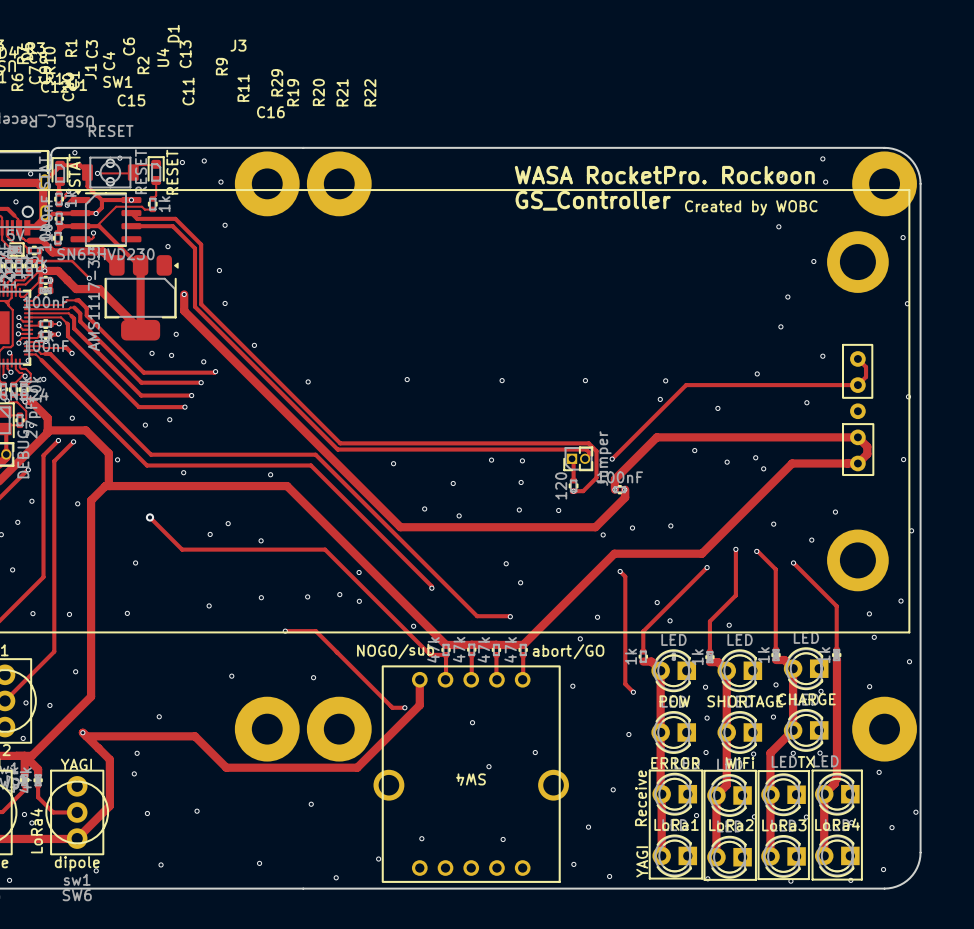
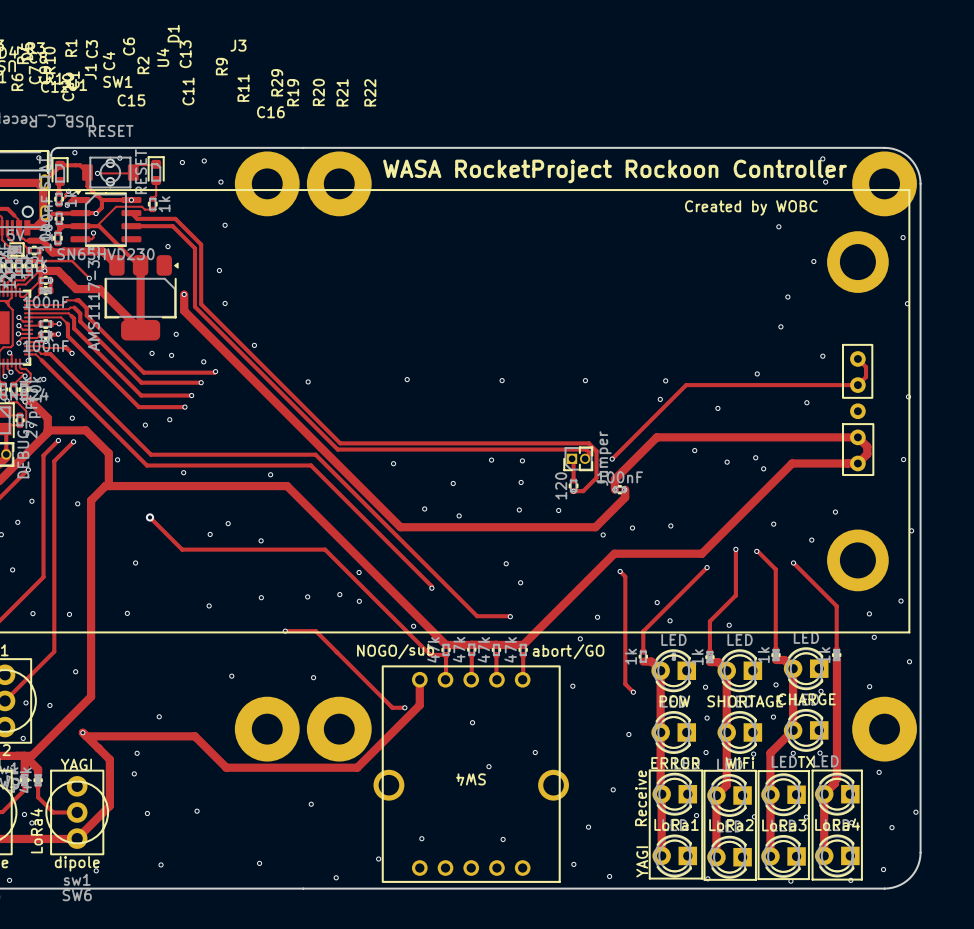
text: STAT (74, 170) -> none
text: RESET (172, 172) -> none
via position: (30, 173) -> (38, 157)
text: WASA RocketPro. Rockoon (664, 175) -> WASA RocketProject Rockoon Controller (615, 171)
text: GS_Controller (593, 200) -> none

